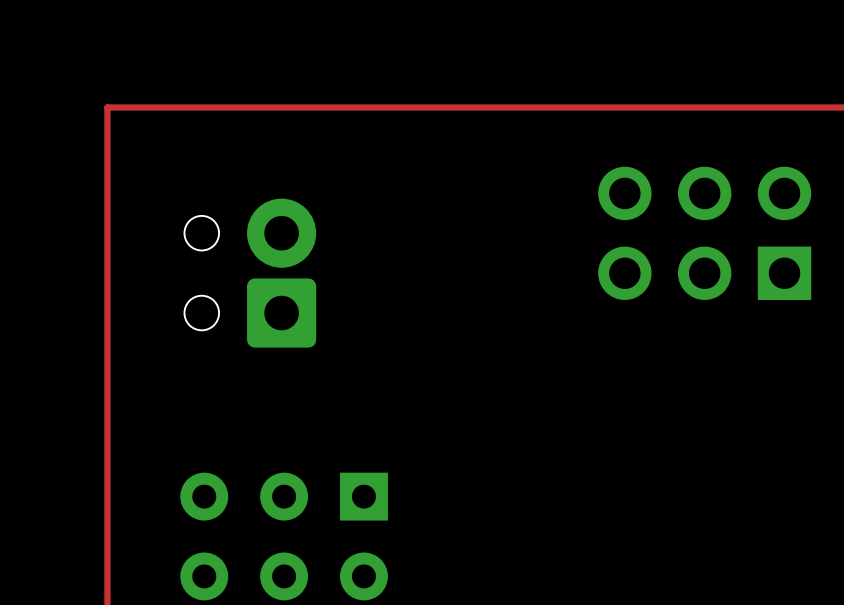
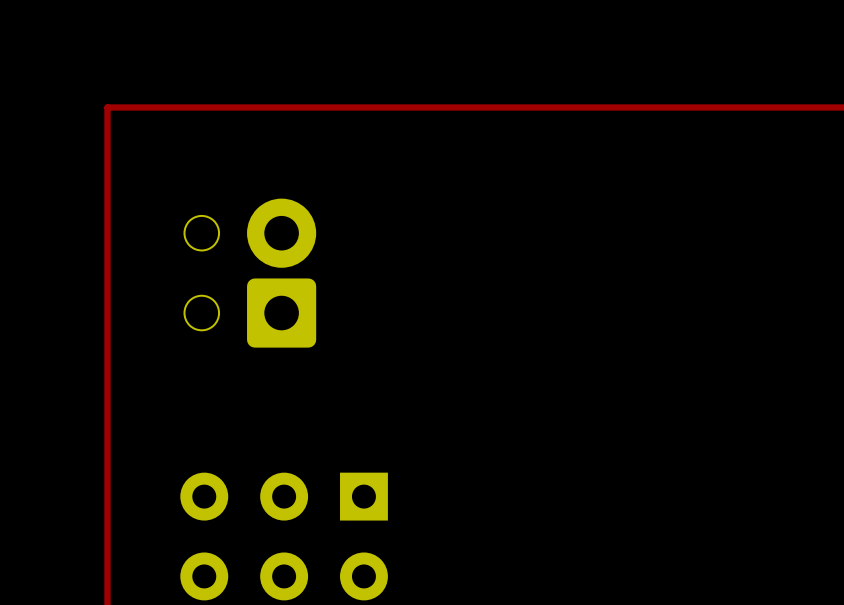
part: (704, 233) -> none

